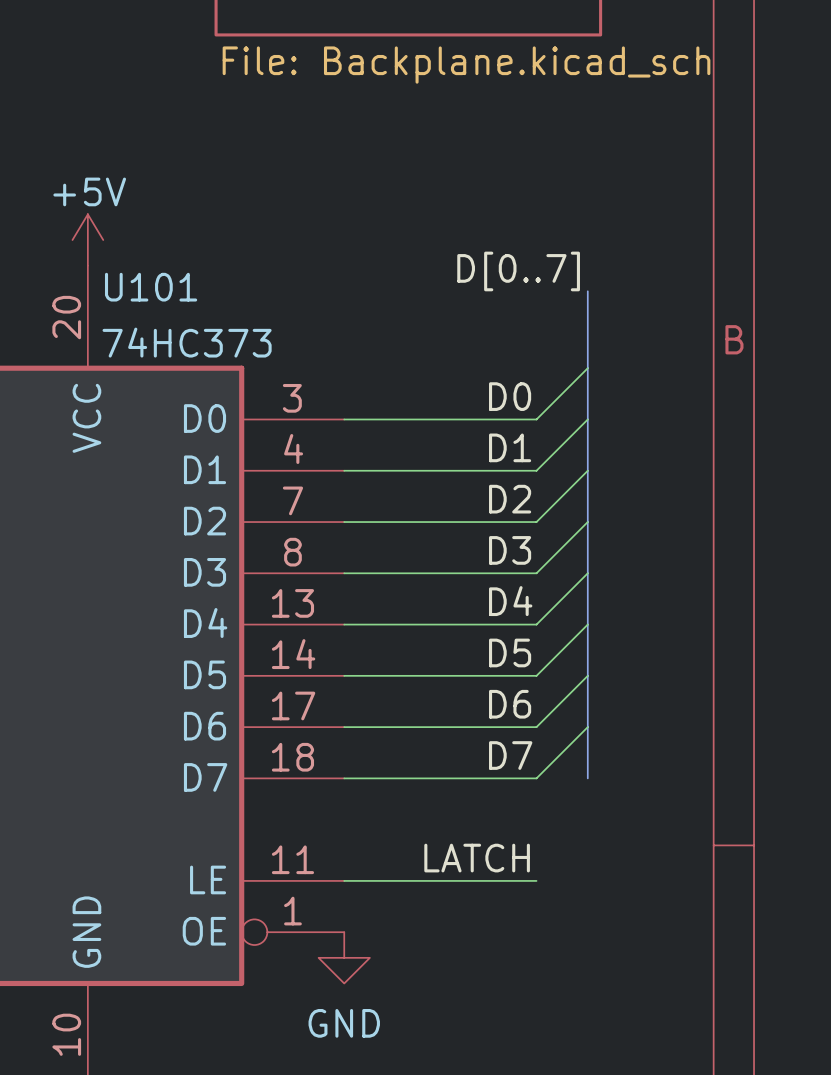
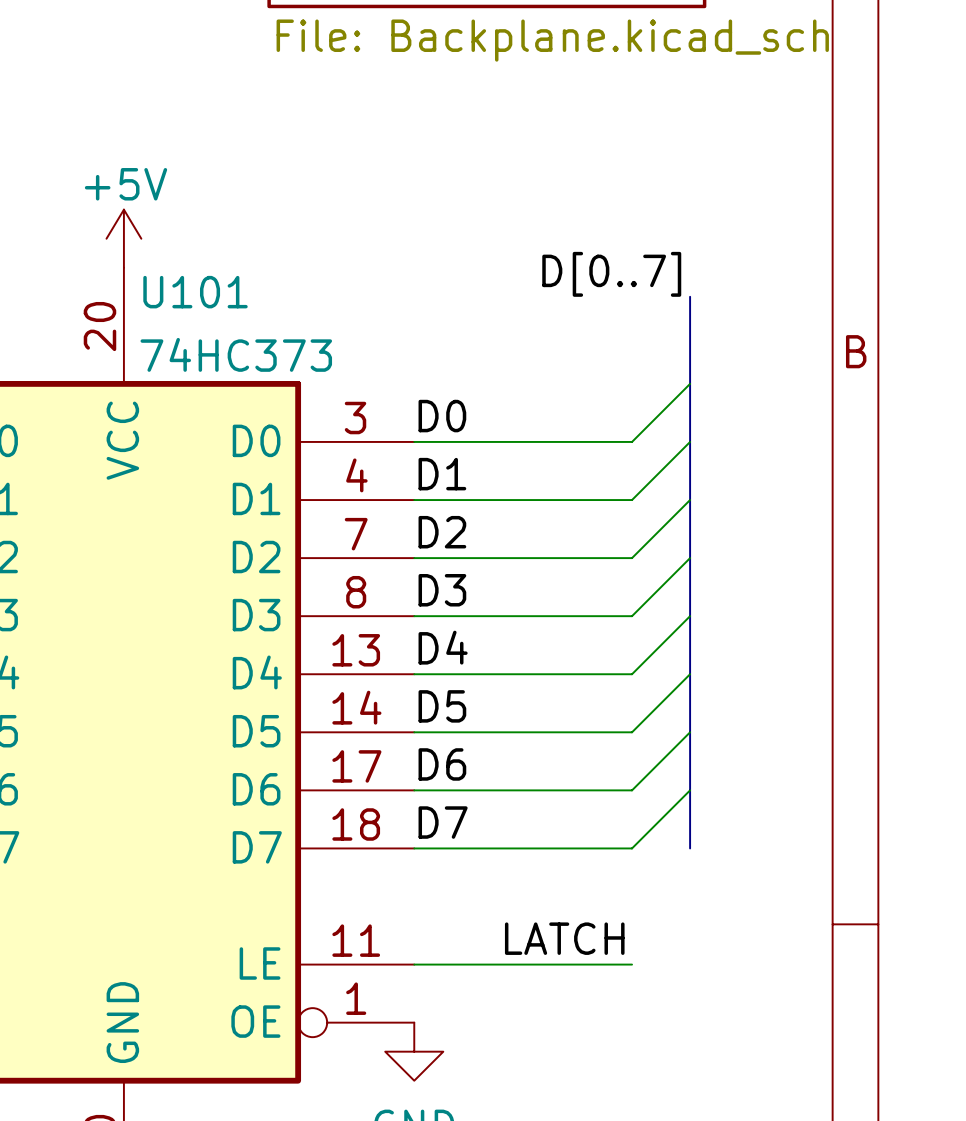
label position: D0 (510, 396) -> D0 (442, 416)
label position: D1 (510, 447) -> D1 (442, 474)
label position: D2 (510, 499) -> D2 (442, 532)
label position: D3 (510, 550) -> D3 (442, 590)
label position: D4 (510, 601) -> D4 (443, 647)
label position: D5 (510, 652) -> D5 (442, 706)
label position: D6 (510, 704) -> D6 (442, 764)
label position: D7 (510, 755) -> D7 (443, 822)

